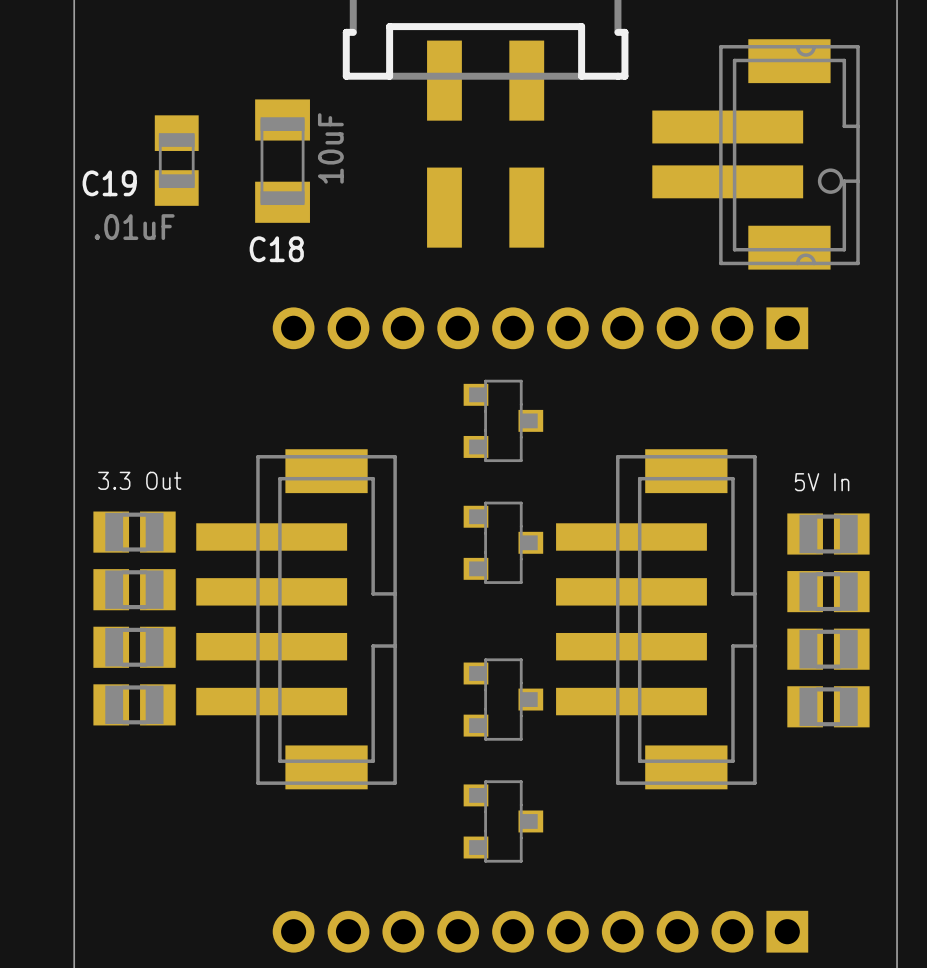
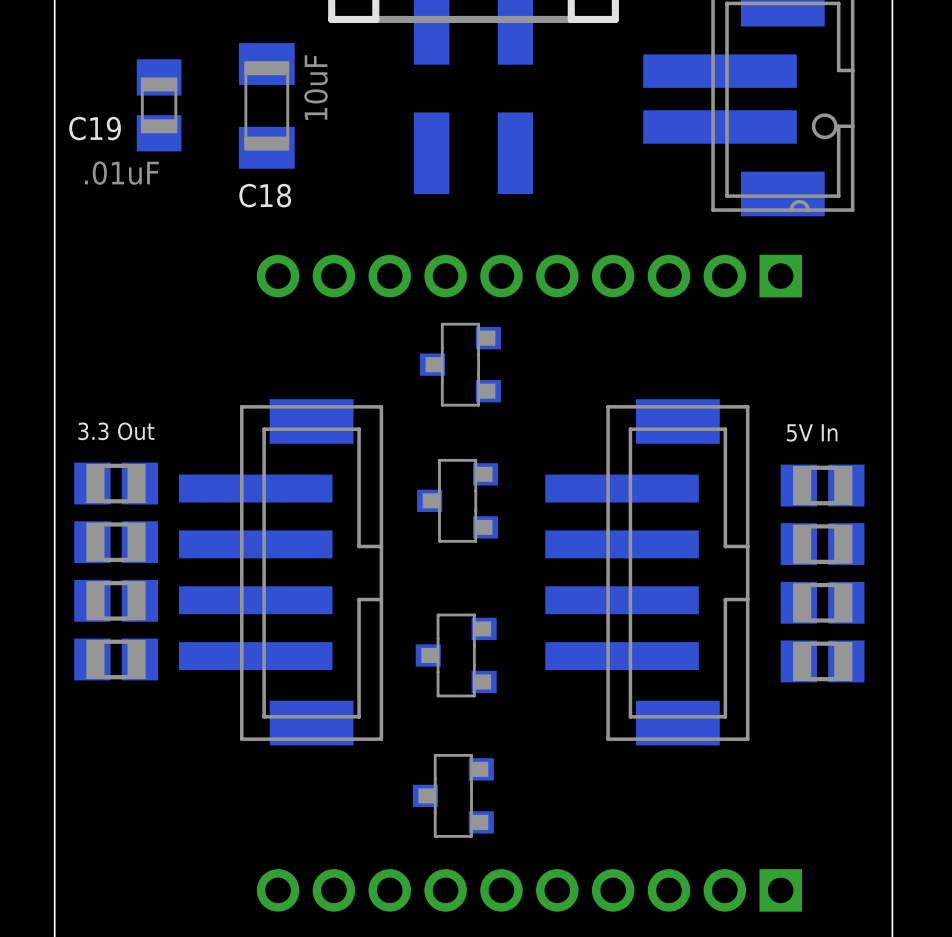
part rotation: 0° (503, 420) -> 180° (460, 364)
part rotation: 0° (503, 542) -> 180° (457, 500)
part rotation: 0° (503, 699) -> 180° (456, 655)
part rotation: 0° (503, 821) -> 180° (453, 795)

